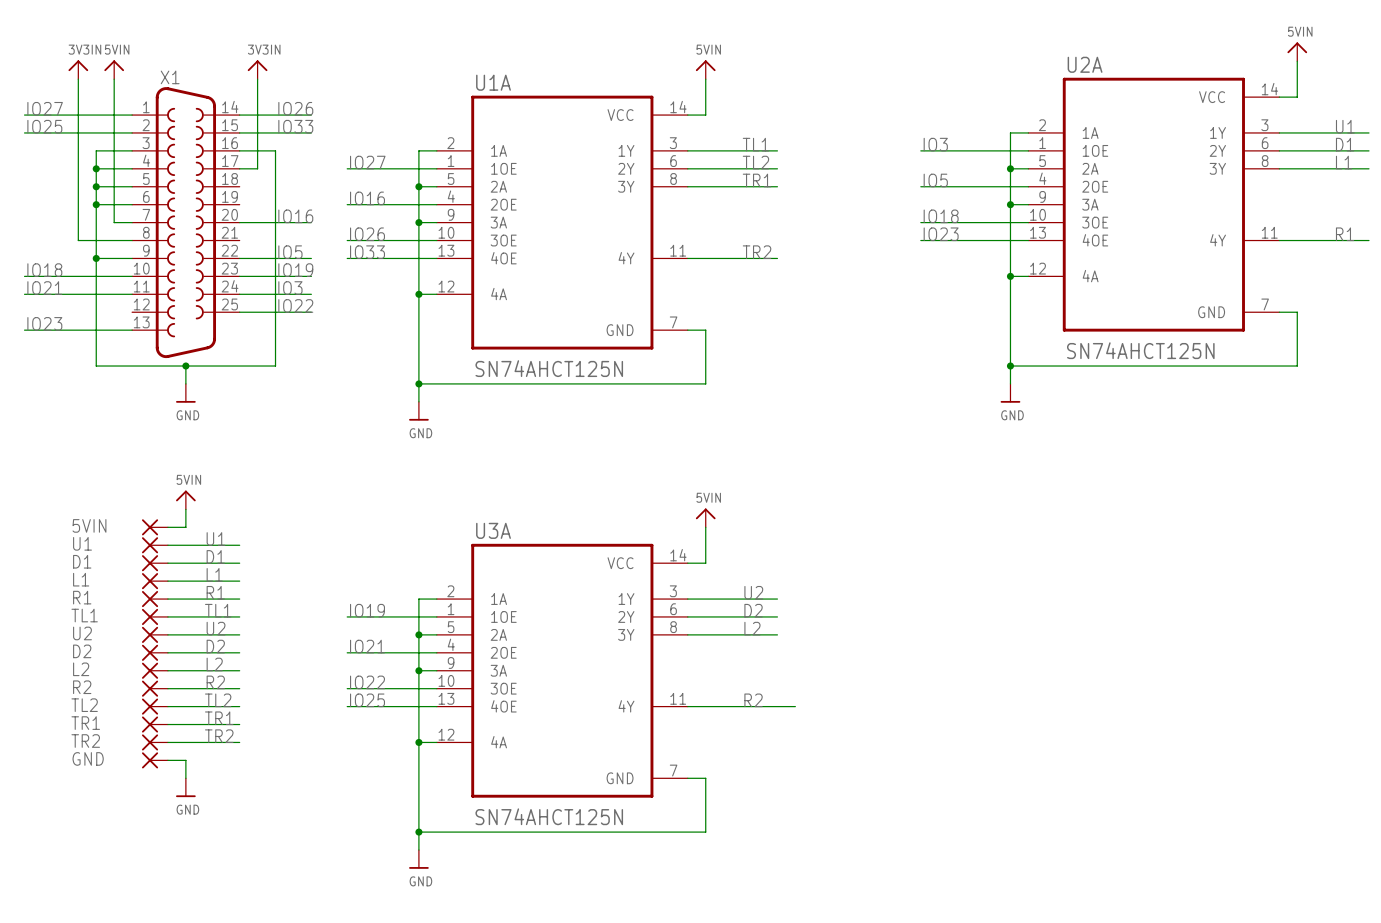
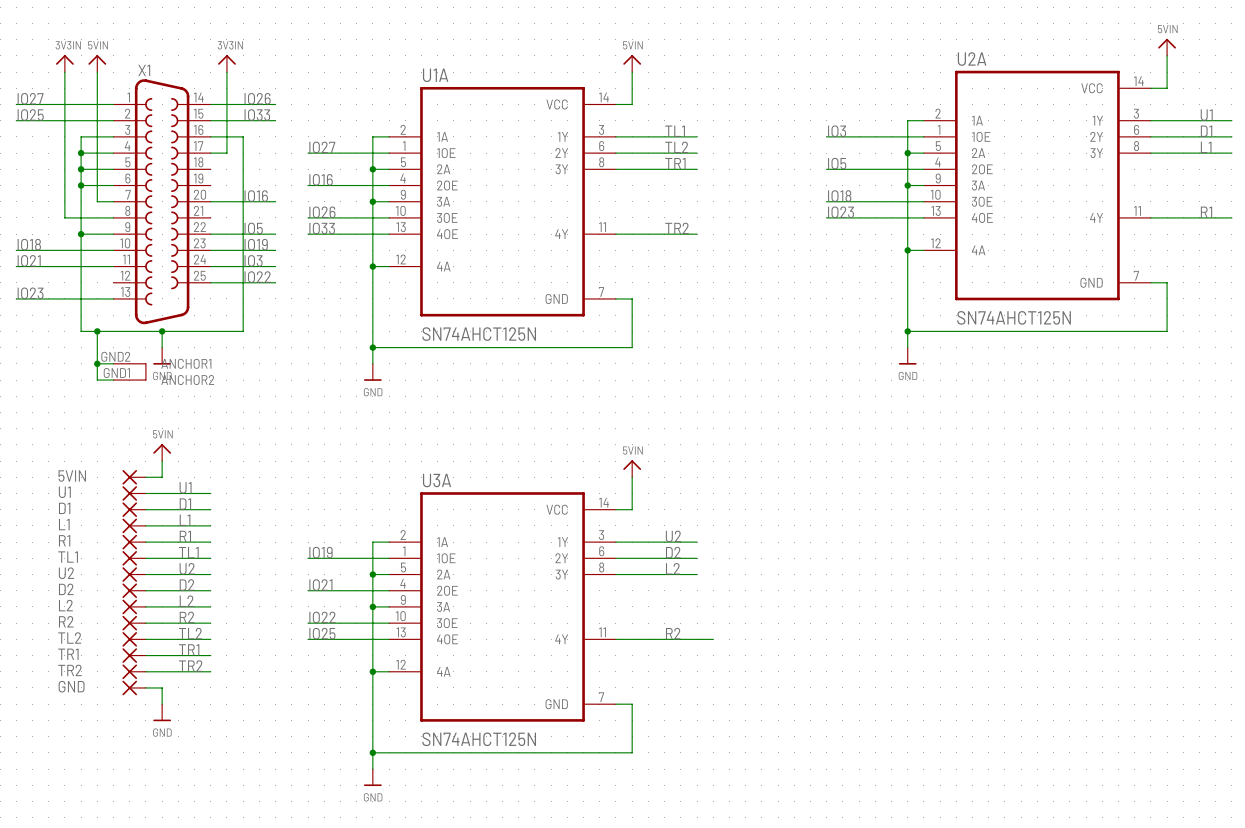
X1 symbol: [132, 87, 240, 359] -> [113, 79, 211, 381]
wire: none -> (97, 331) (97, 380) (113, 380)
junction: none -> (97, 331)
wire: none -> (97, 363) (113, 363)
junction: none -> (97, 363)

